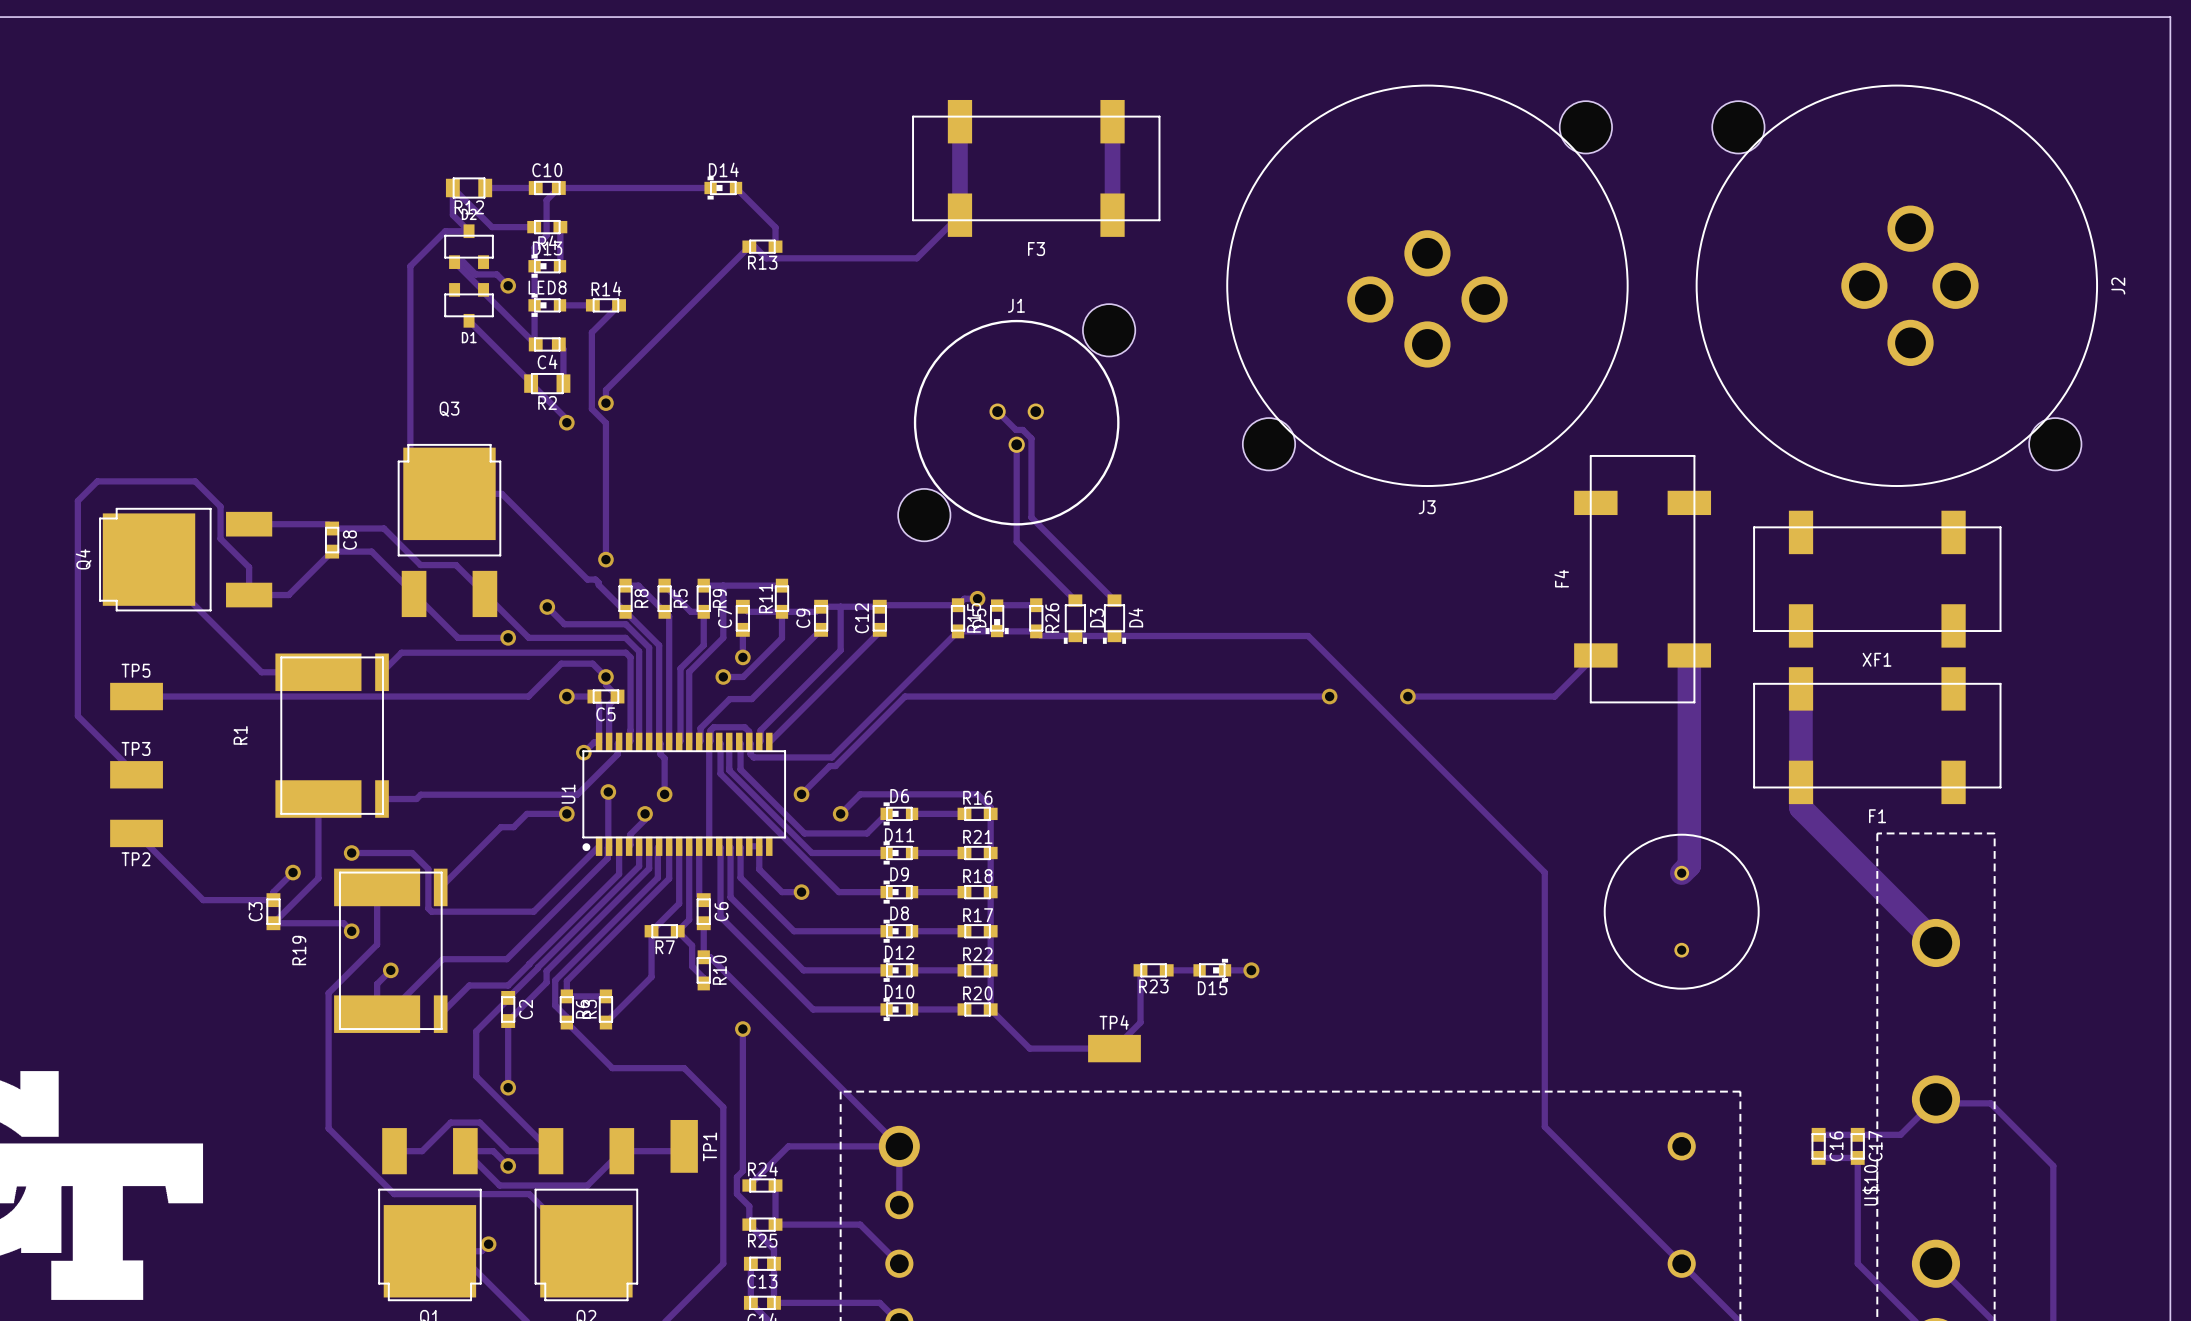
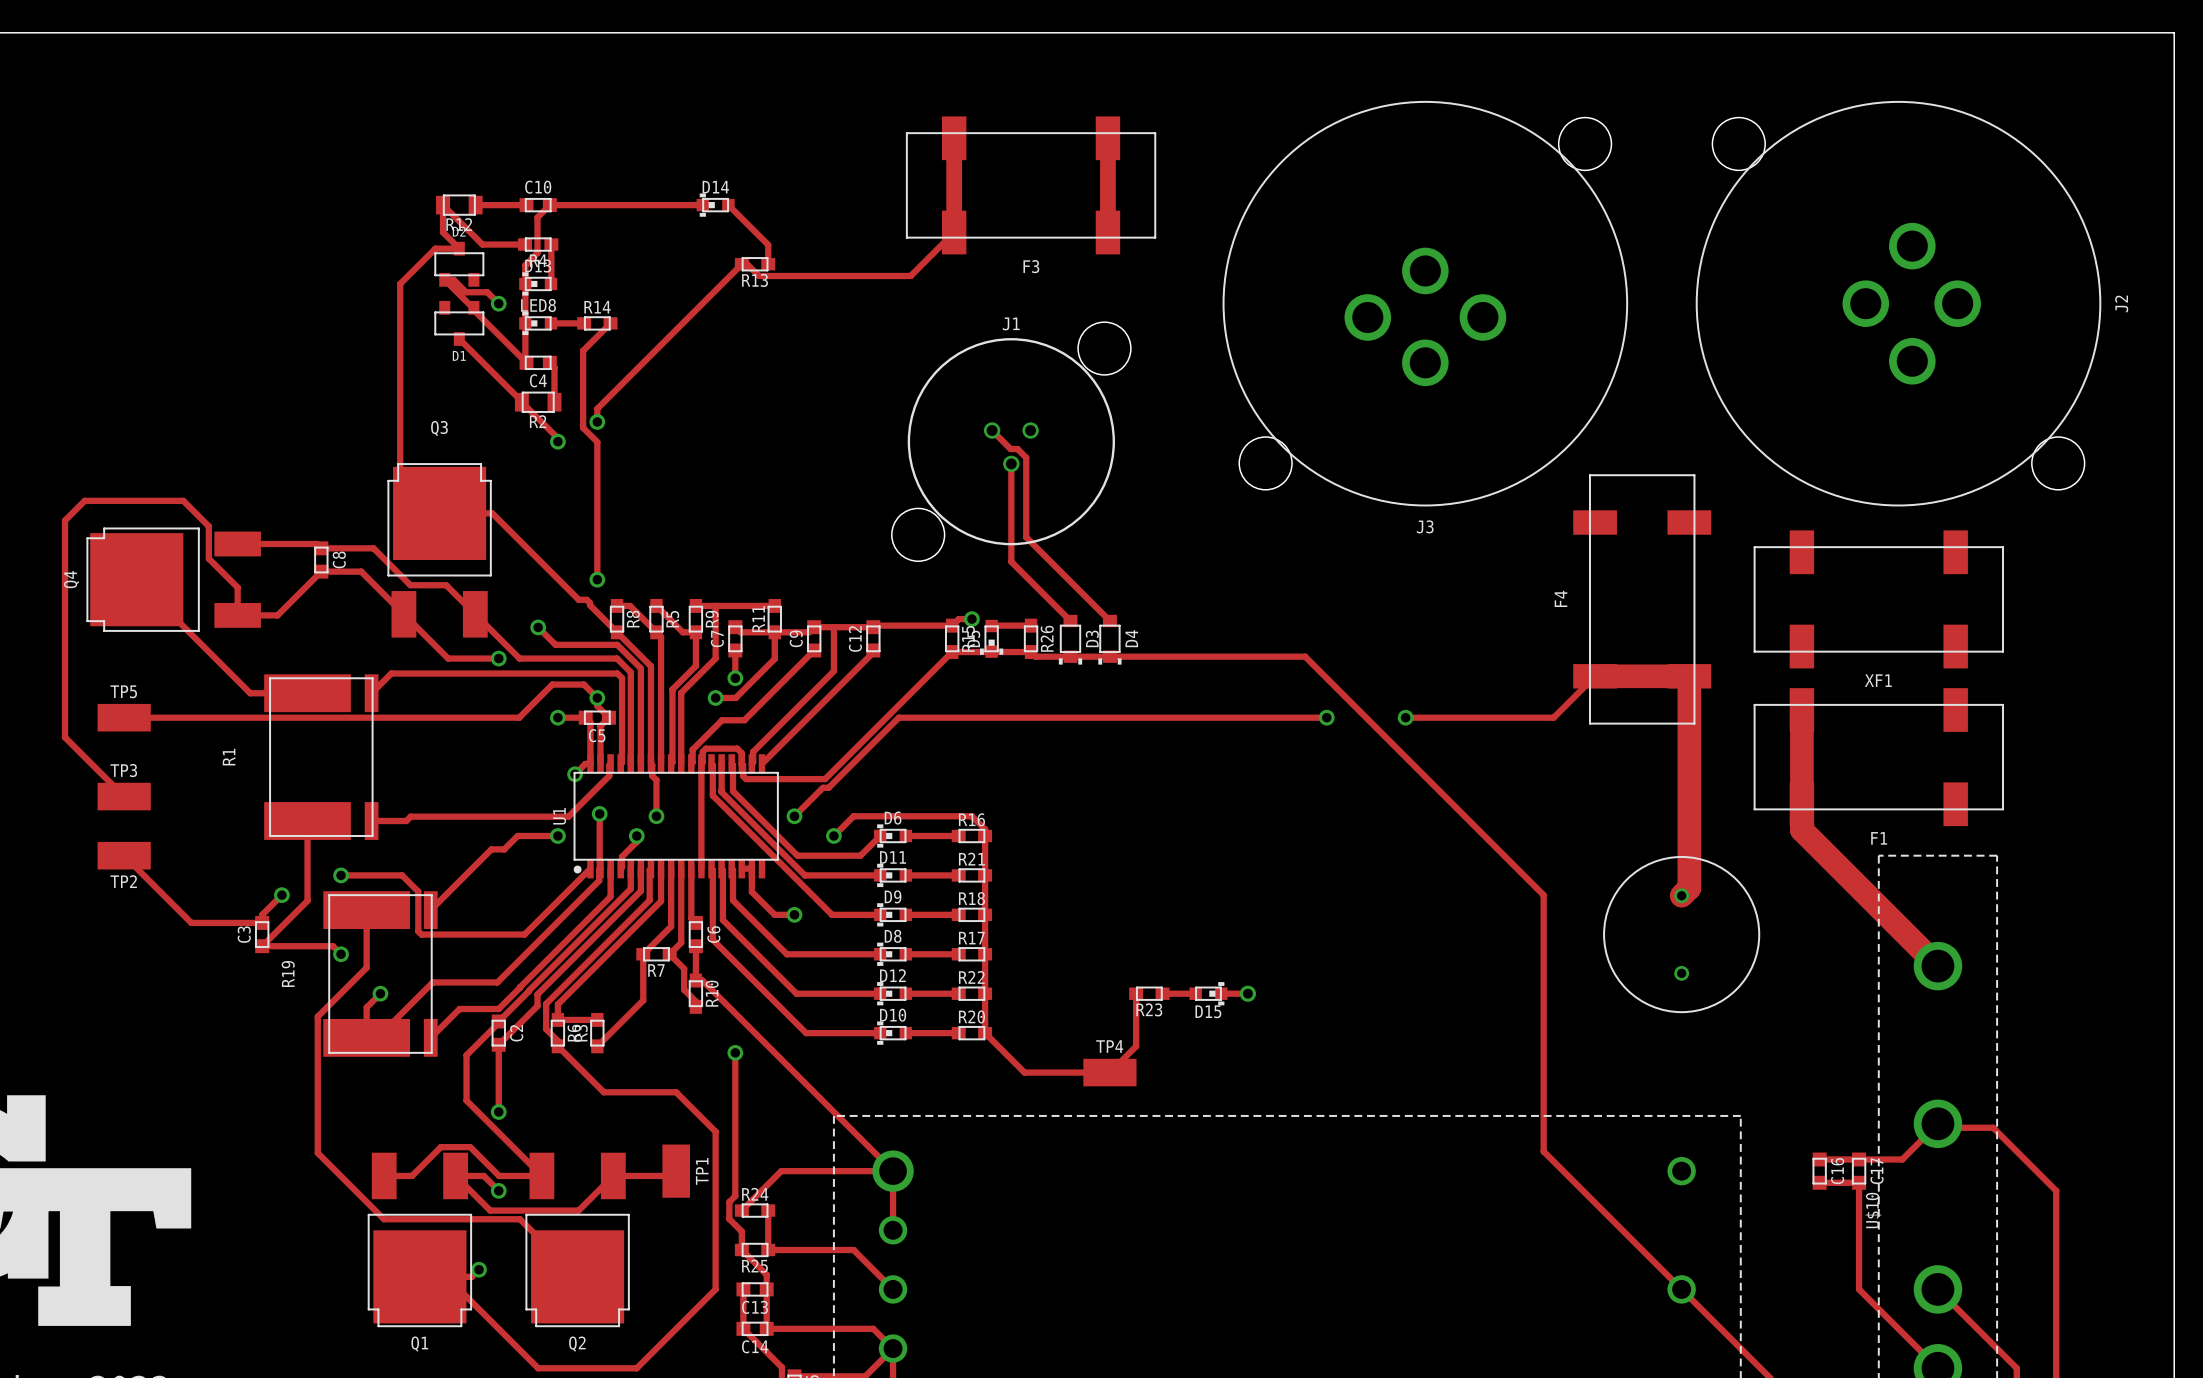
track: none -> (1595, 676) (1689, 676)

